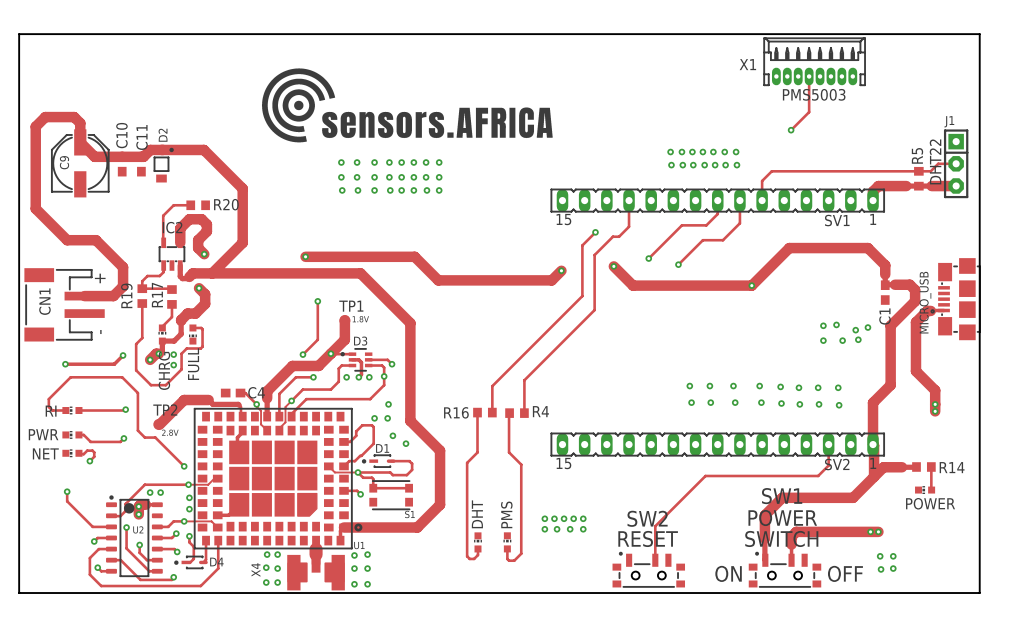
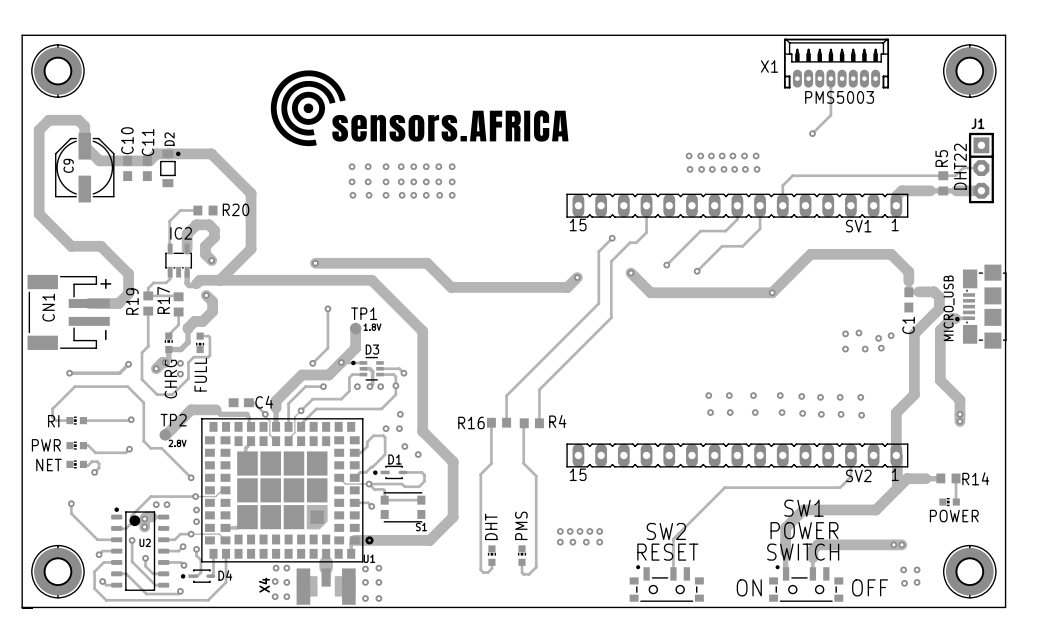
part: none -> (57, 71)
part: none -> (969, 71)
part: none -> (57, 571)
part: none -> (969, 571)

